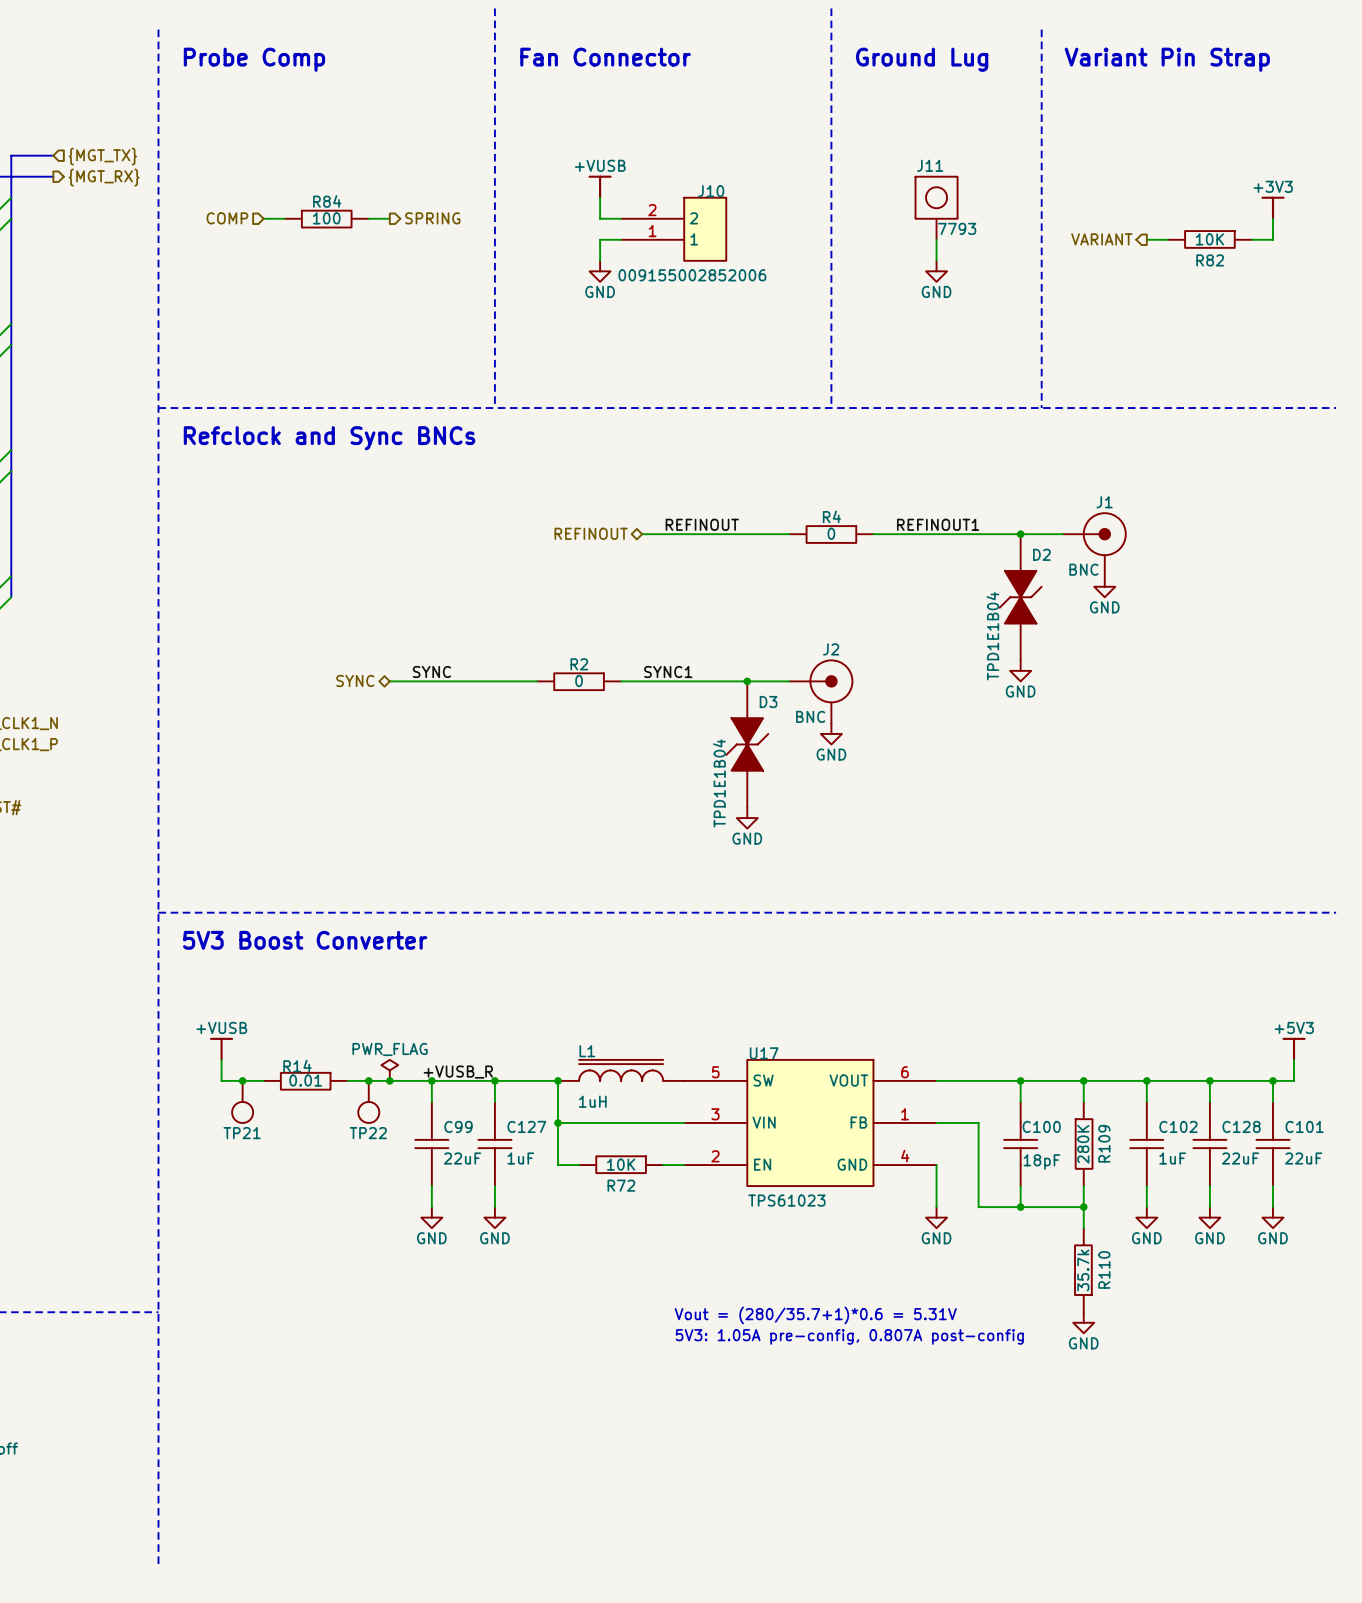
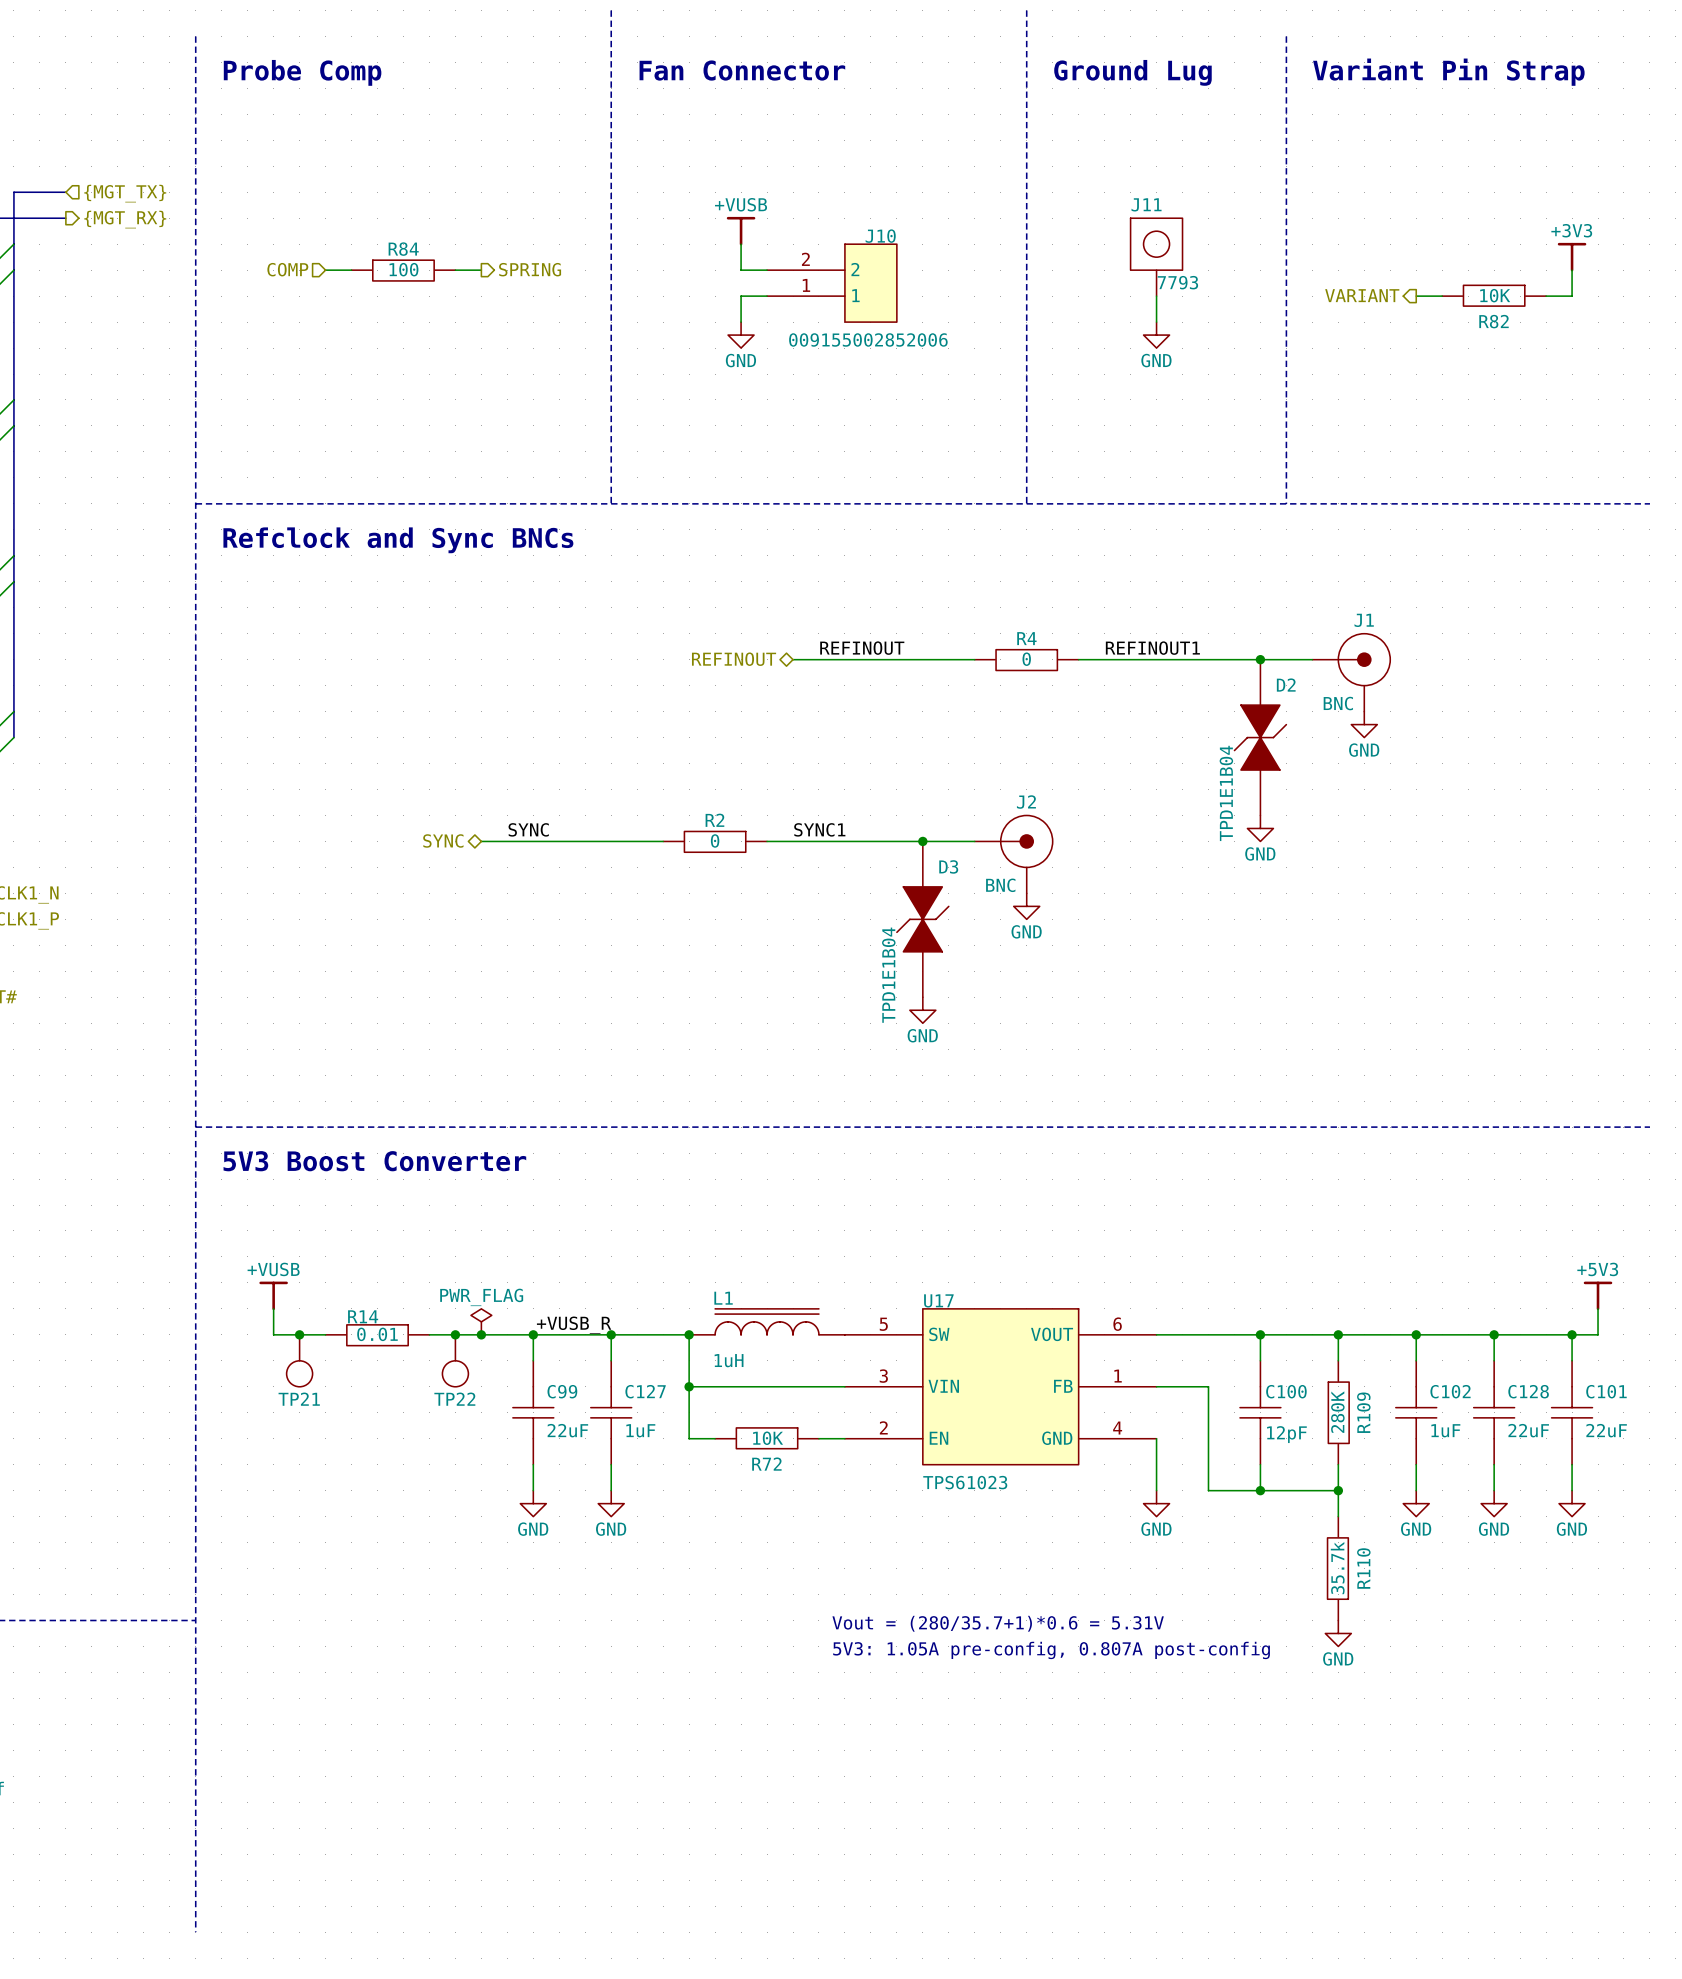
C100 value: 18pF (1041, 1162) -> 12pF (1286, 1434)

